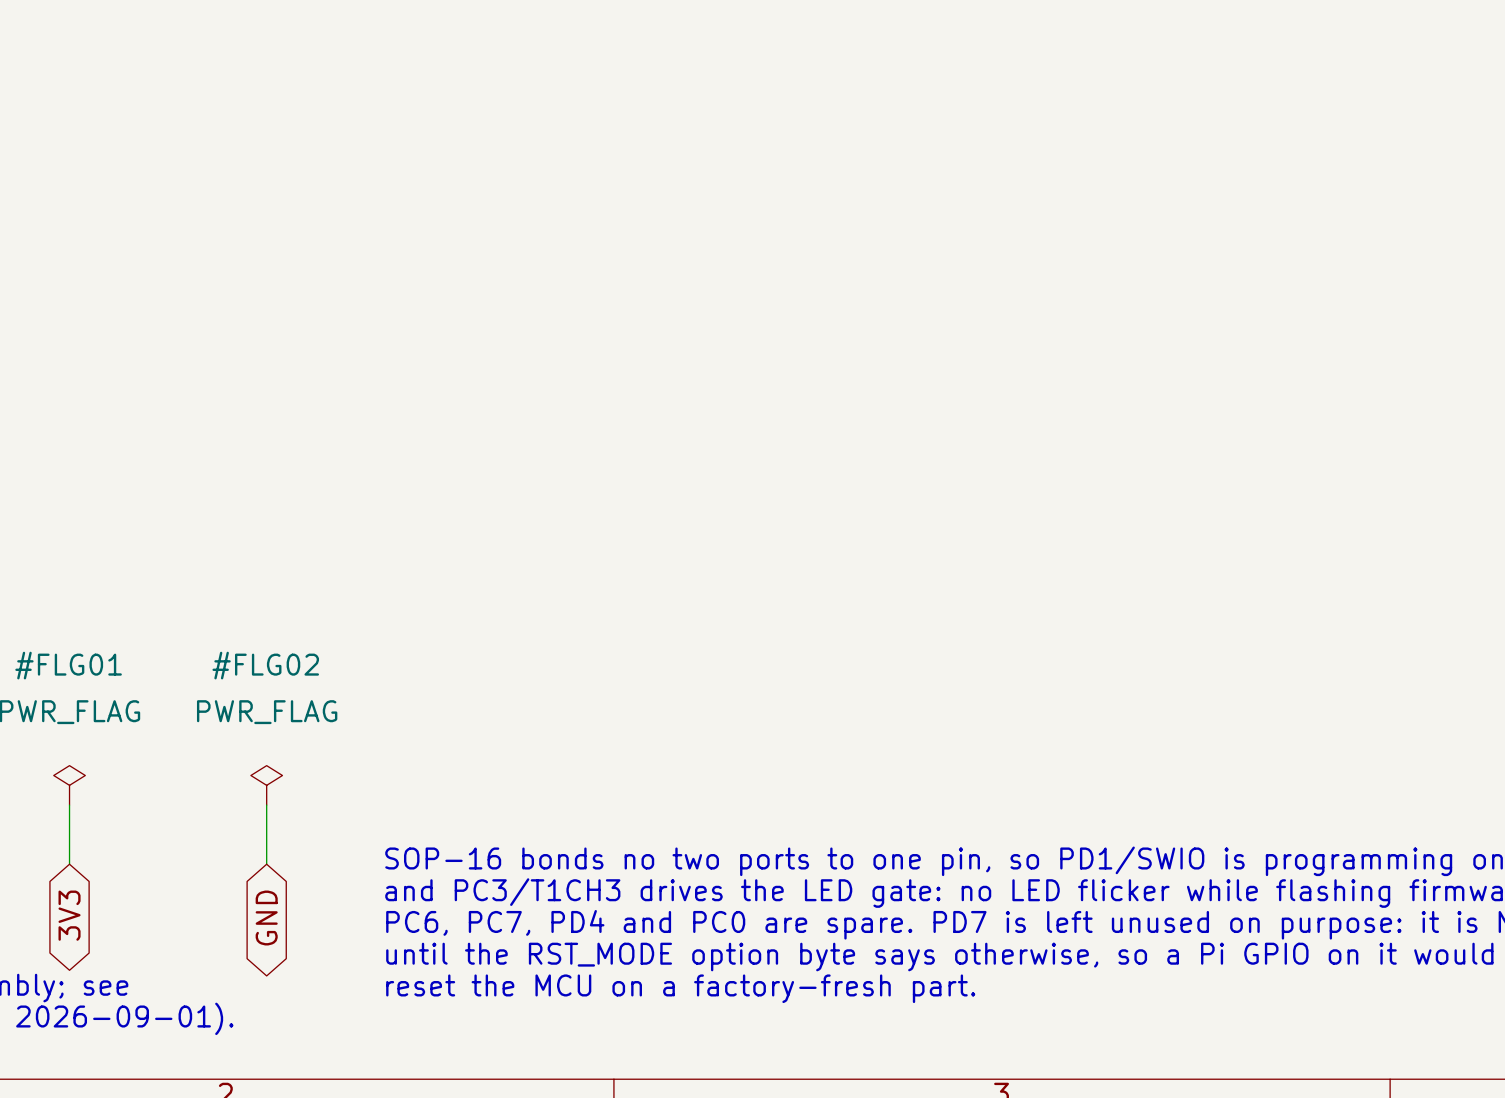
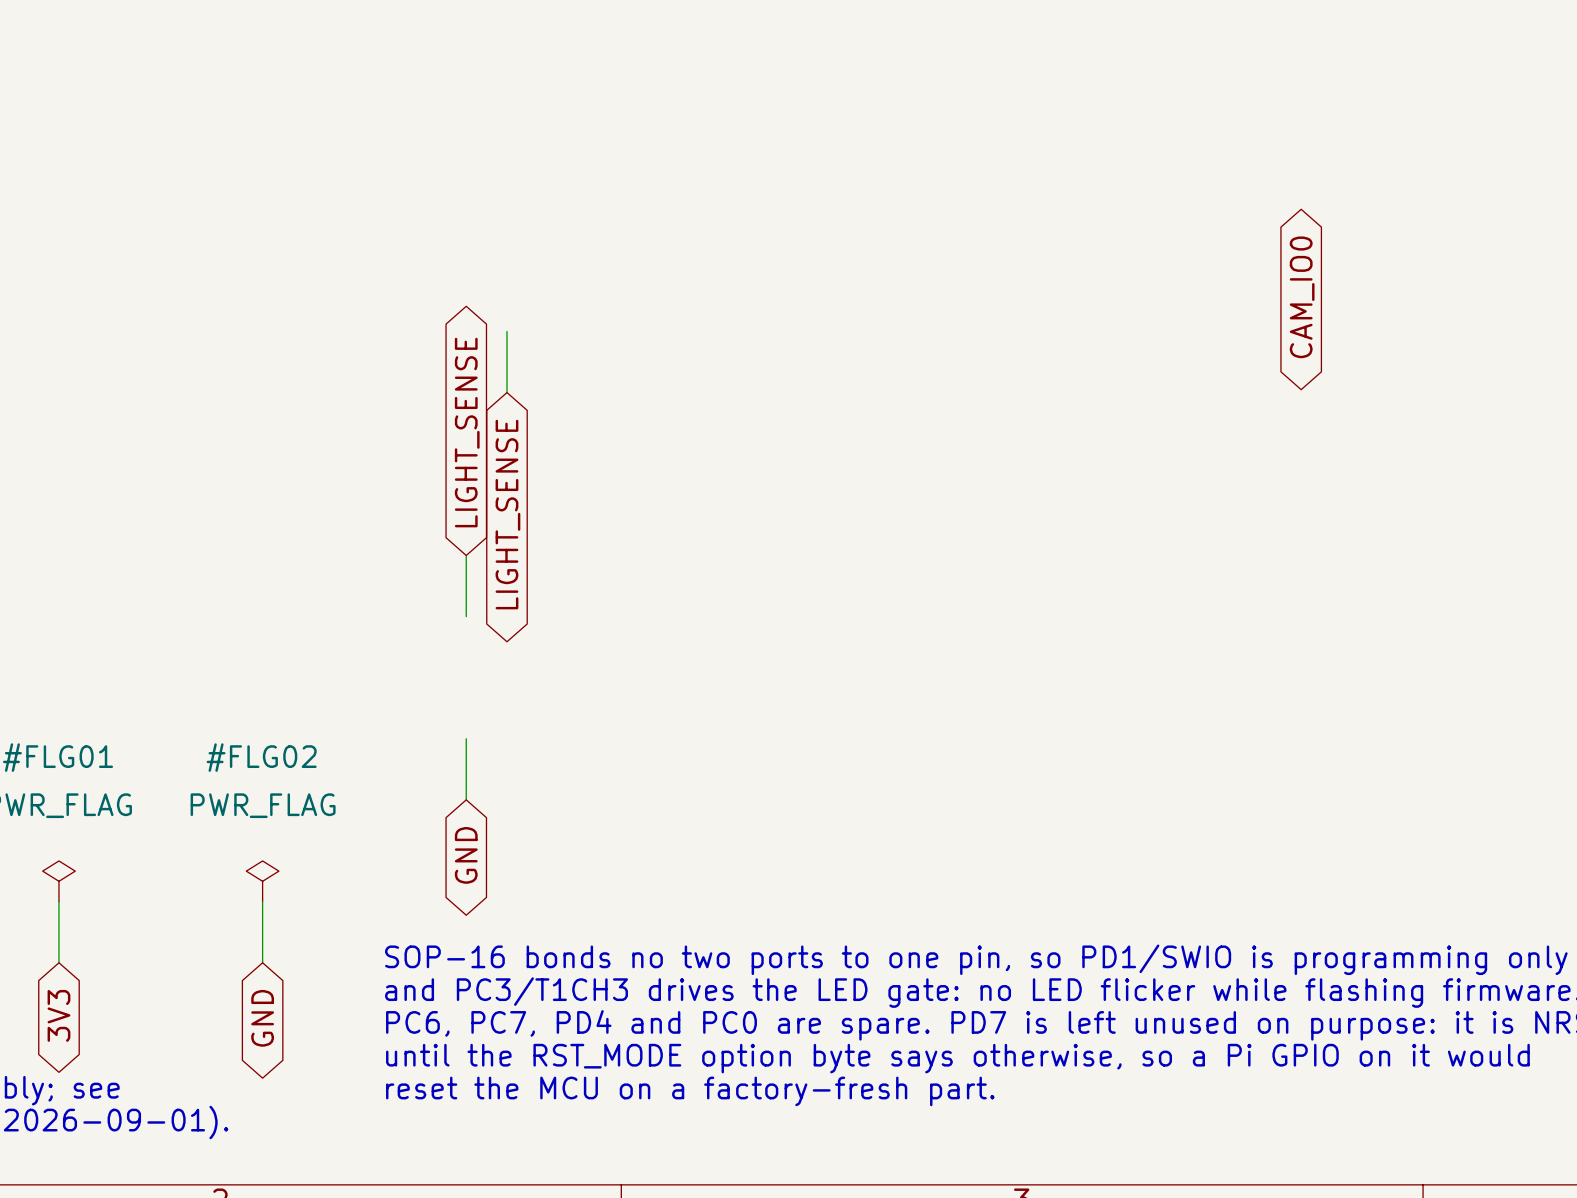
global label: none -> CAM_IO0 (1302, 297)
wire: none -> (506, 331) (506, 392)
global label: none -> LIGHT_SENSE (467, 432)
global label: none -> LIGHT_SENSE (507, 514)
wire: none -> (466, 555) (466, 616)
wire: none -> (466, 738) (466, 799)
global label: none -> GND (466, 855)

